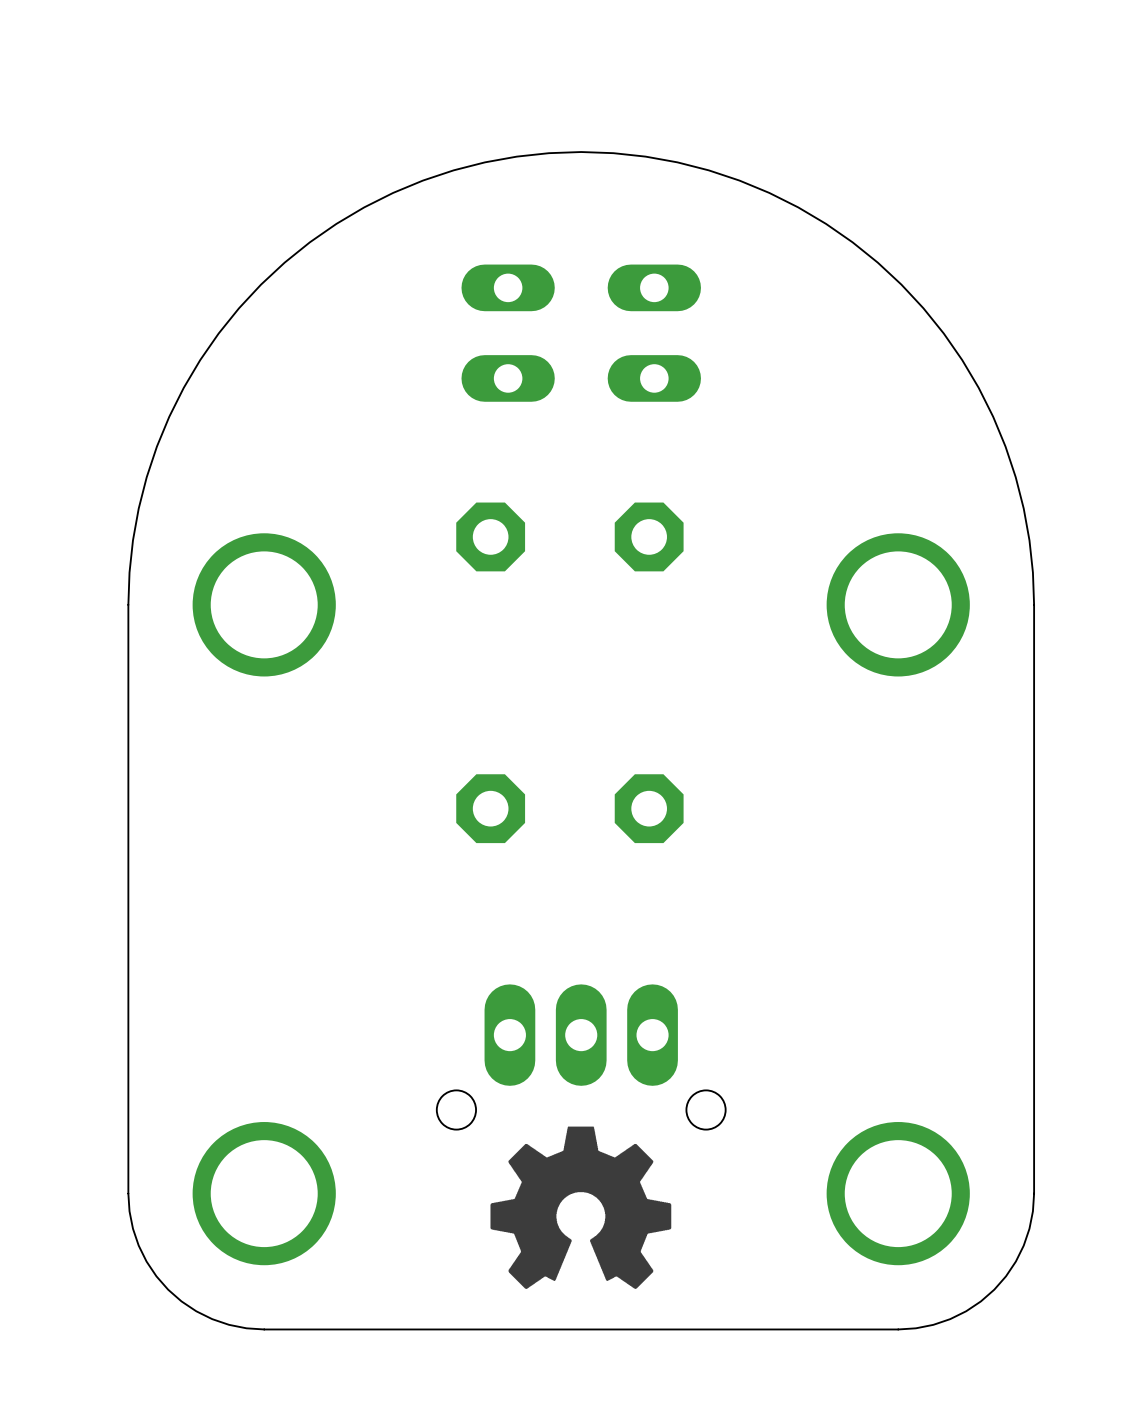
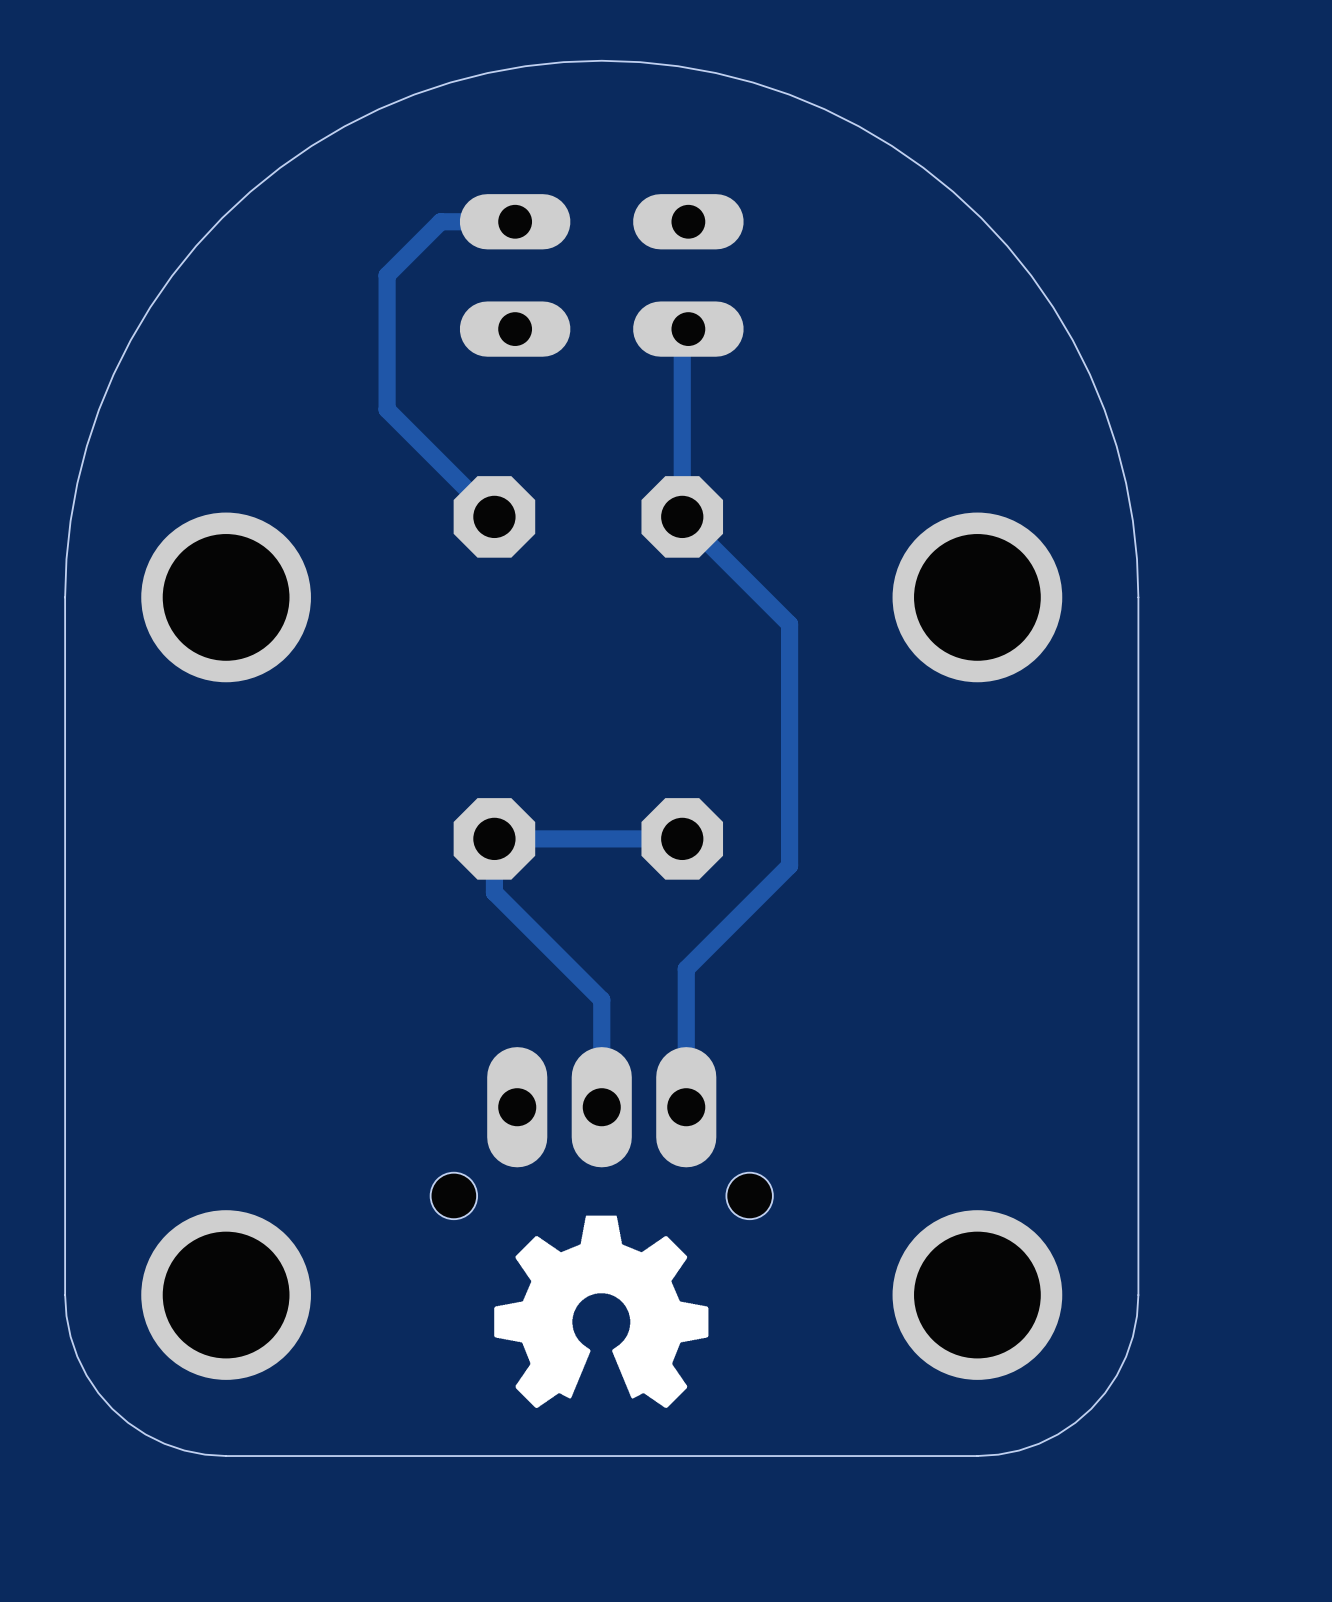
track: none -> (515, 221) (440, 221) (387, 275) (387, 409) (494, 516)
track: none -> (688, 329) (682, 335) (682, 516) (789, 624) (789, 865) (686, 969) (686, 1107)
track: none -> (682, 838) (494, 838) (494, 892) (601, 999) (601, 1107)

